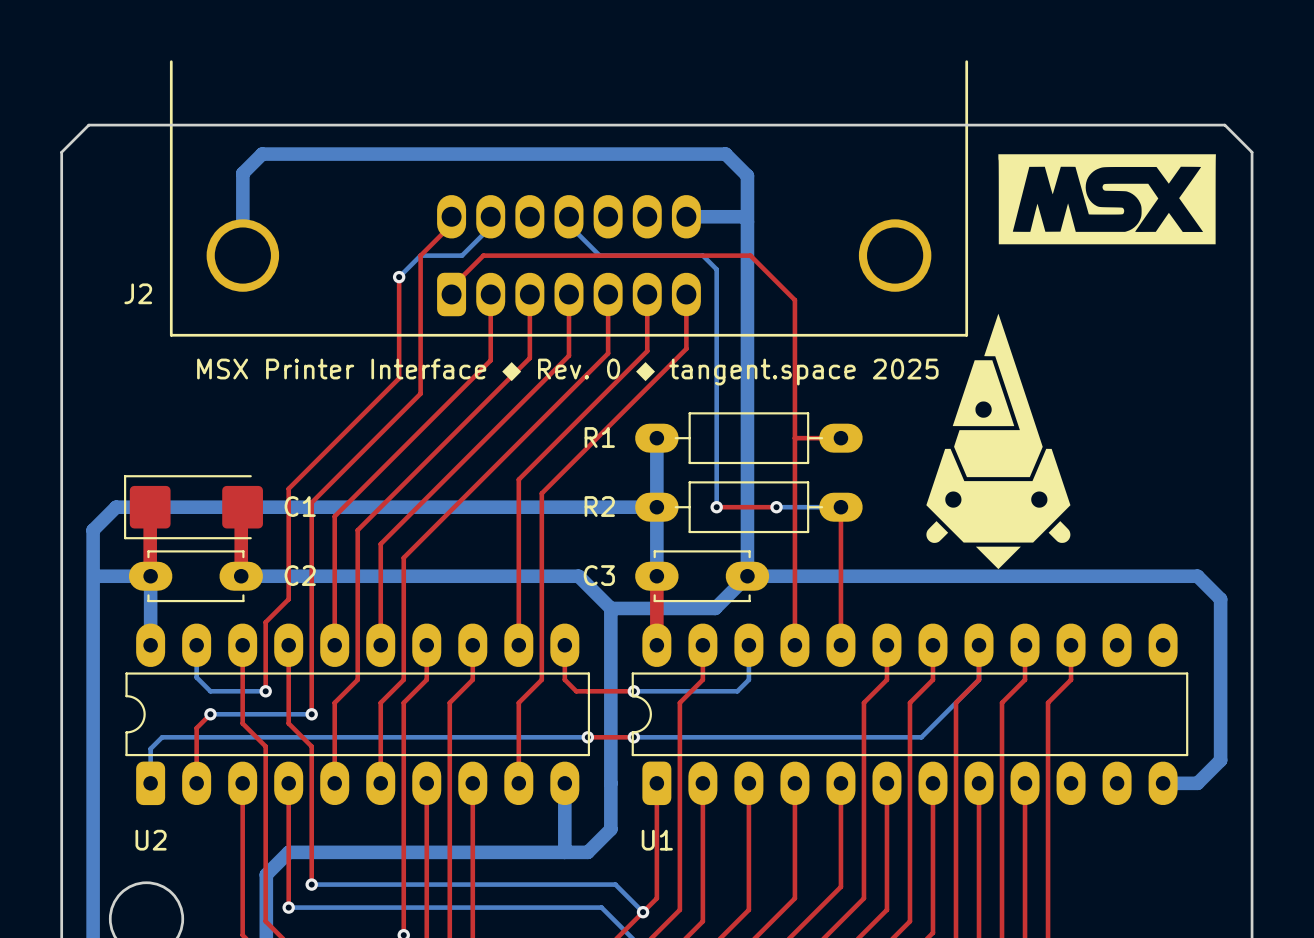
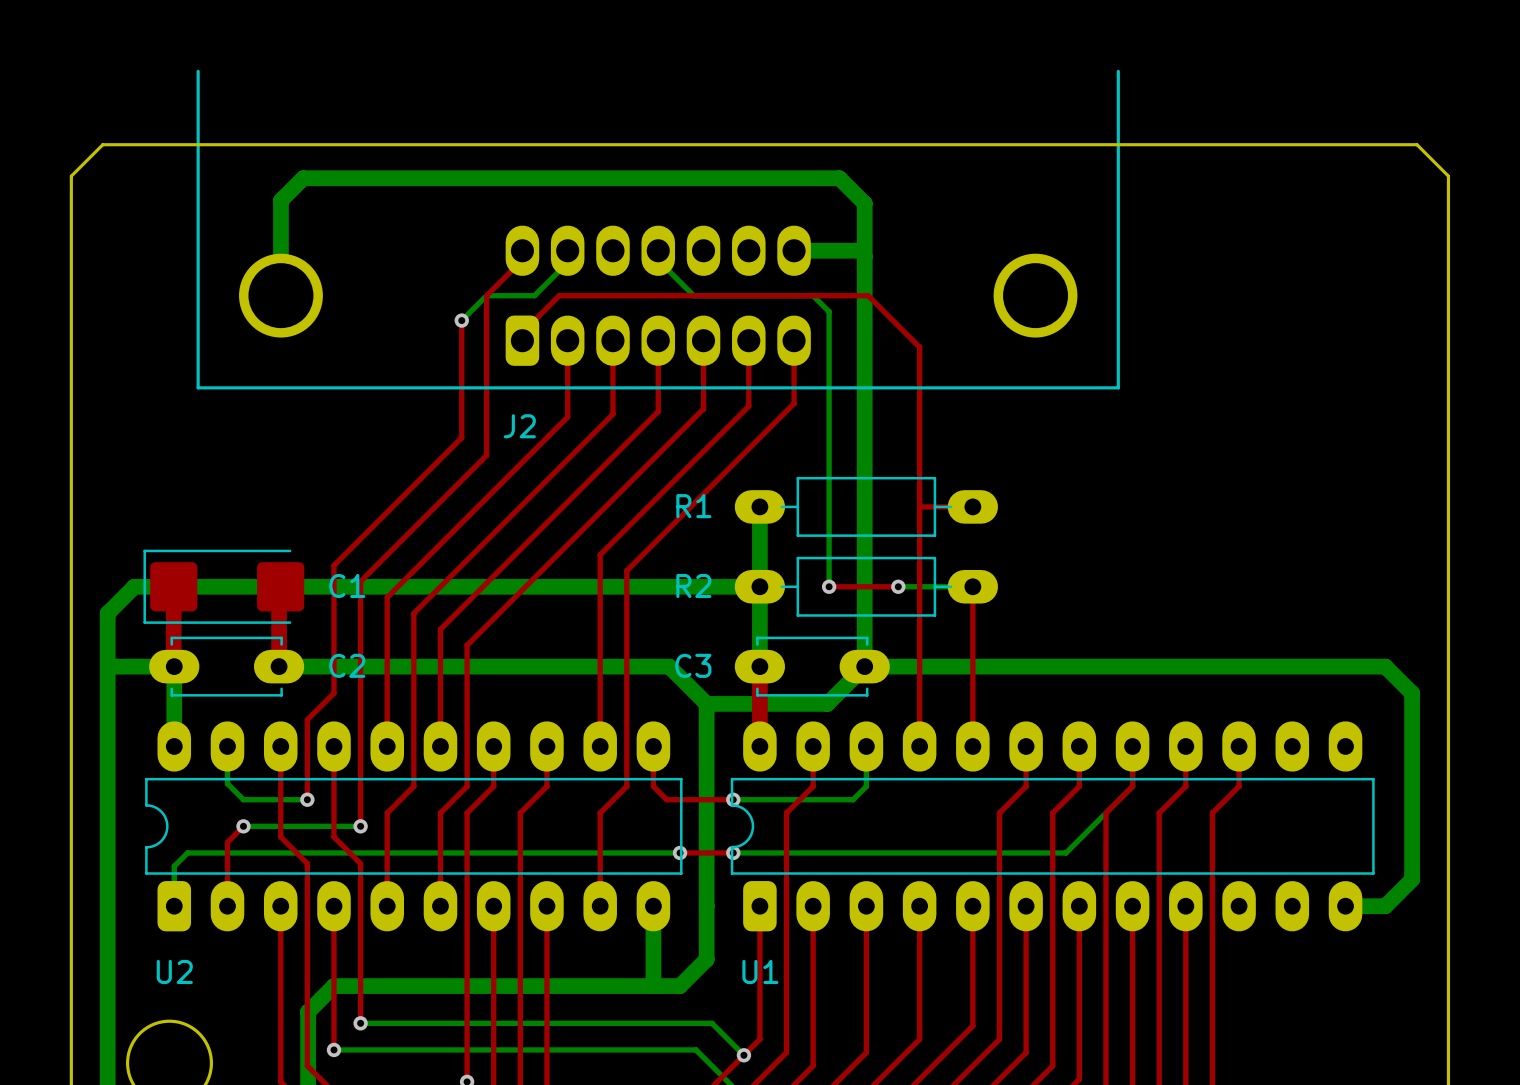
drawing: [998, 154, 1216, 245] -> none
J2 name position: J2 (138, 293) -> J2 (519, 426)
drawing: [926, 313, 1071, 570] -> none
text: MSX Printer Interface ◆ Rev. 0 ◆ tangent.space 2025 (567, 372) -> none

